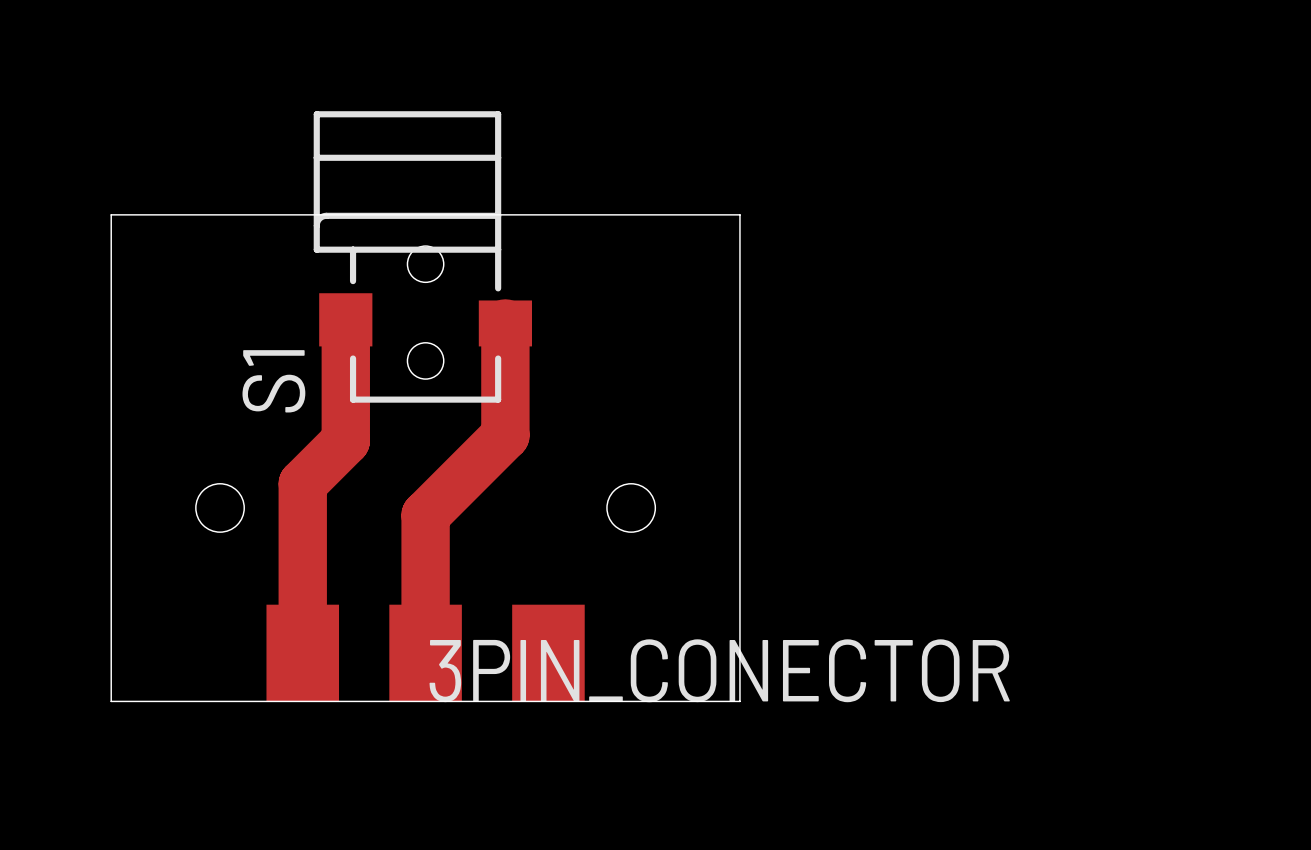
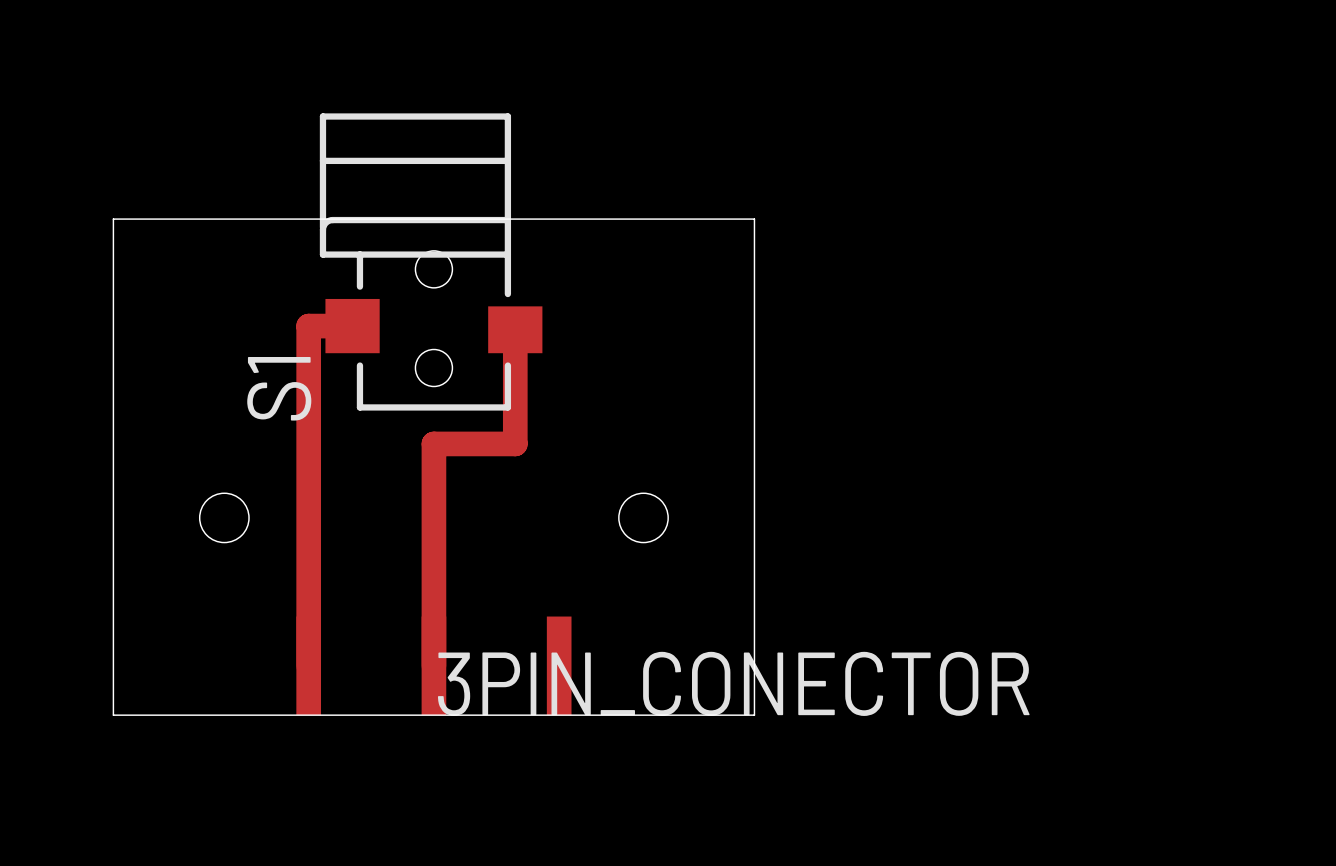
top track: (345, 319) (345, 440) (302, 483) -> (352, 326) (308, 326) (308, 493)
top track width: thick (505, 323) (505, 435) -> thin (515, 329) (515, 443)
top track: (505, 435) (425, 515) -> (515, 443) (433, 443) (433, 525)
top track width: thick (302, 483) (302, 653) -> thin (308, 493) (308, 665)
top track width: thick (425, 515) (425, 653) -> thin (433, 525) (433, 665)
part footprint: [266, 604, 585, 702] -> [296, 616, 572, 716]

